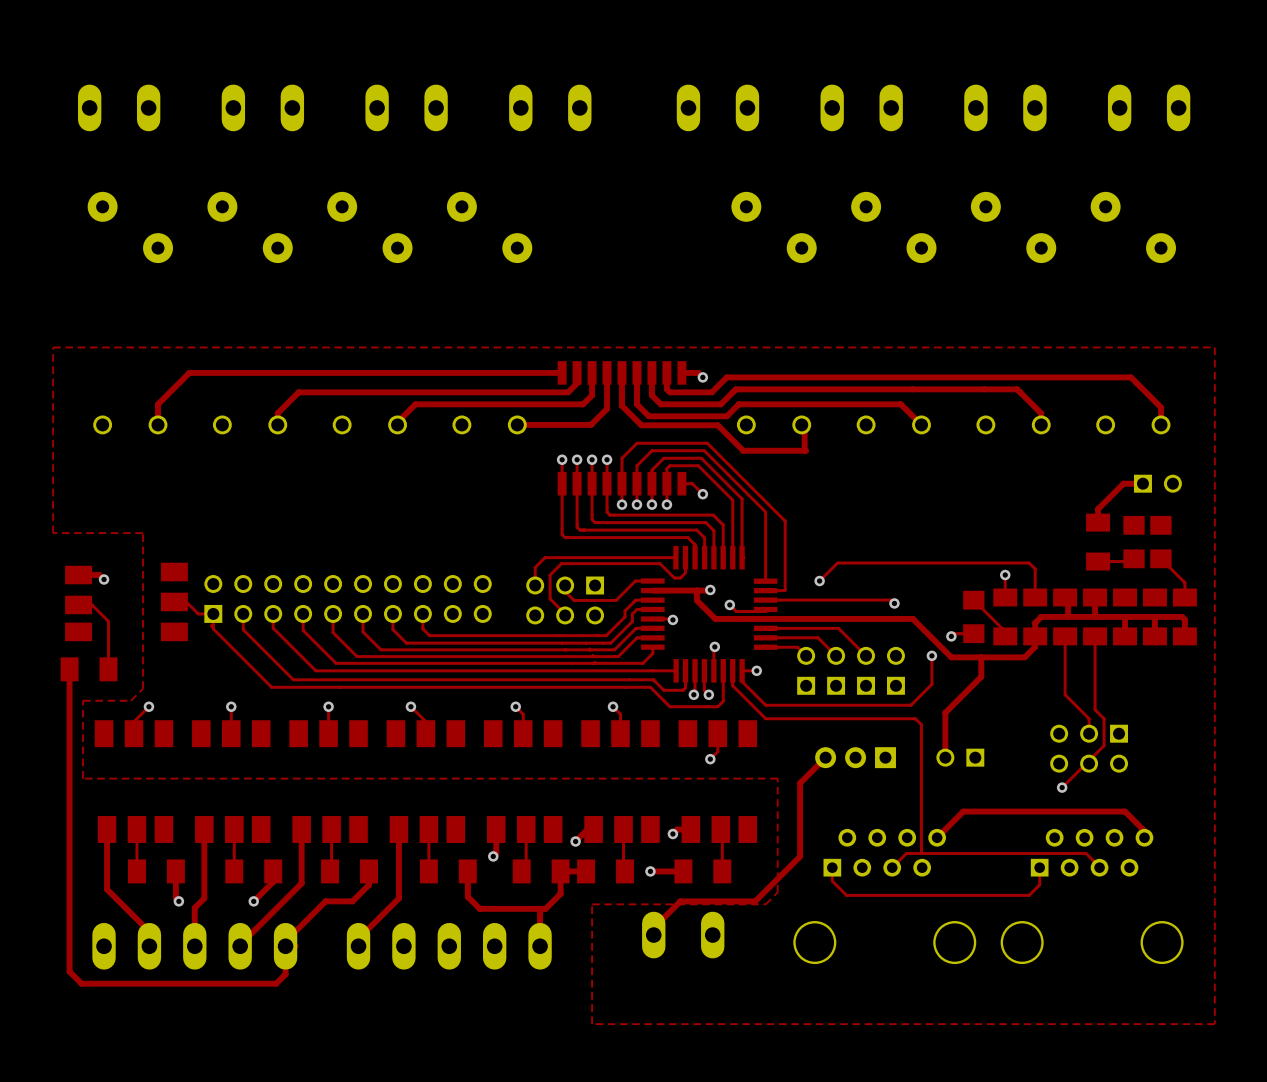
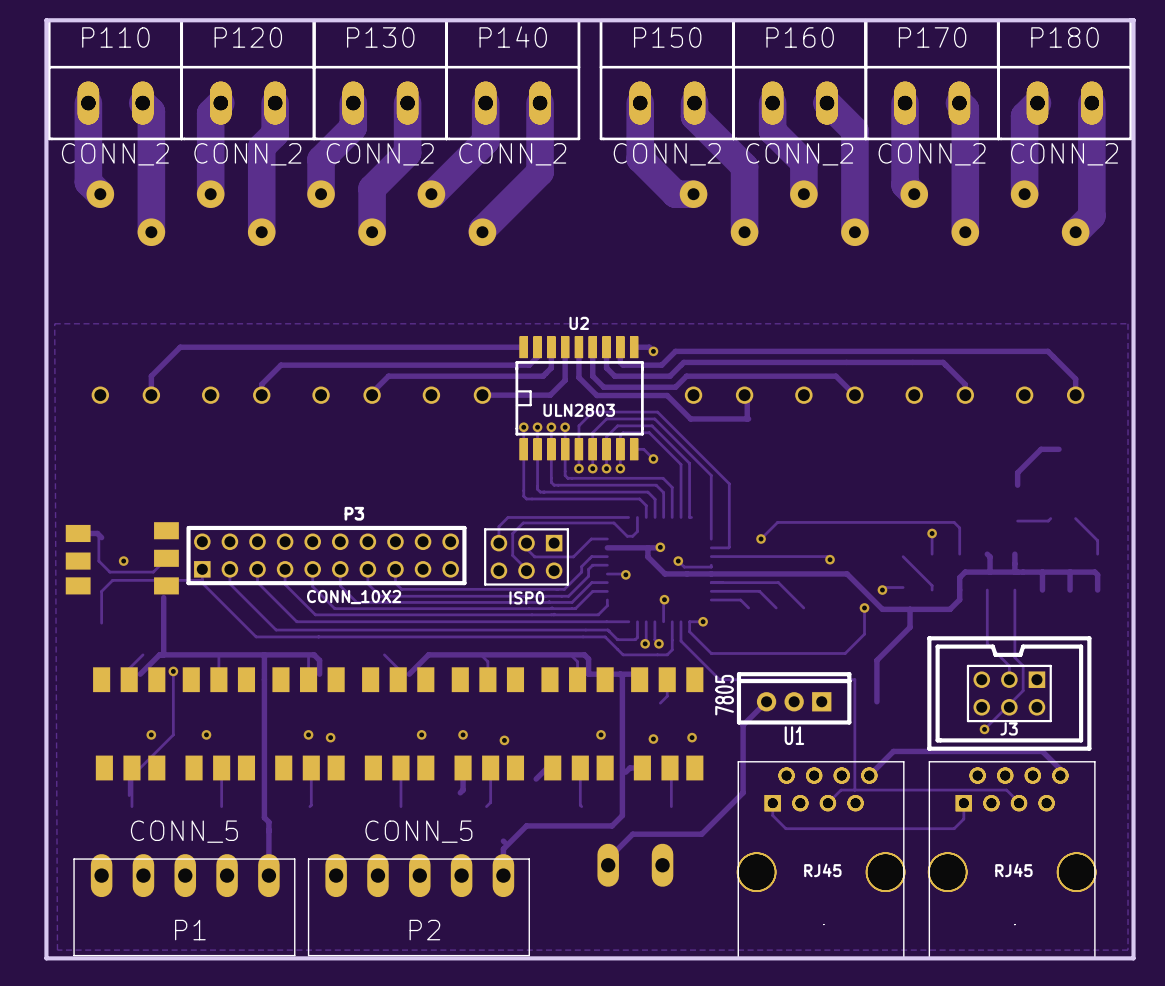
board edge: none -> (46, 20) (1133, 20) (1133, 958) (46, 958) (46, 20)
P110: none -> CONN_2 (115, 79)
P120: none -> CONN_2 (247, 79)
P130: none -> CONN_2 (380, 79)
P140: none -> CONN_2 (512, 79)
P150: none -> CONN_2 (667, 79)
P160: none -> CONN_2 (799, 79)
P170: none -> CONN_2 (932, 79)
P180: none -> CONN_2 (1064, 79)
track: none -> (88, 103) (88, 182) (100, 194)
track: none -> (142, 103) (151, 111) (151, 232)
track: none -> (220, 103) (210, 113) (210, 194)
track: none -> (275, 103) (275, 133) (261, 147) (261, 232)
track: none -> (353, 103) (353, 127) (321, 159) (321, 194)
track: none -> (407, 103) (407, 153) (372, 188) (372, 232)
track: none -> (485, 103) (485, 141) (431, 194)
track: none -> (540, 103) (540, 172) (482, 229) (482, 232)
track: none -> (640, 103) (640, 158) (675, 194) (693, 194)
track: none -> (694, 103) (694, 116) (744, 166) (744, 232)
track: none -> (772, 103) (772, 131) (803, 162) (803, 194)
track: none -> (826, 103) (854, 130) (854, 232)
track: none -> (905, 103) (905, 185) (914, 194)
track: none -> (959, 103) (965, 108) (965, 232)
track: none -> (1037, 103) (1024, 115) (1024, 194)
track: none -> (1091, 103) (1091, 216) (1075, 232)
zone outline: (53, 347) (53, 533) (142, 533) (142, 688) (130, 700) (83, 700) (83, 778) (777, 778) (777, 892) (765, 904) (592, 904) (592, 1024) (1214, 1024) (1214, 347) -> (54, 323) (57, 950) (1128, 950) (1128, 323) (1125, 323)
U2: none -> ULN2803 (579, 398)
part: (1157, 483) -> none
part: (1098, 542) -> none
part: (1134, 542) -> none
part: (1160, 542) -> none
track: none -> (98, 534) (98, 561) (109, 572) (153, 572) (163, 561)
via position: (104, 579) -> (123, 561)
part: (348, 598) -> none
P3: none -> CONN_10X2 (326, 555)
ISP0: none -> (526, 556)
track: (174, 601) (186, 601) (198, 613) (213, 613) -> none
track: (78, 604) (92, 604) (108, 621) (108, 669) -> none
part: (709, 614) -> none
part: (973, 616) -> none
part: (1005, 616) -> none
part: (1035, 616) -> none
part: (1065, 616) -> none
part: (1095, 616) -> none
part: (1125, 616) -> none
part: (1154, 616) -> none
part: (1184, 616) -> none
track: none -> (200, 580) (112, 580) (101, 591) (101, 623)
track: none -> (163, 597) (163, 654)
track: (69, 669) (69, 971) (81, 983) (276, 983) (285, 974) (285, 946) (295, 946) -> none
part: (89, 669) -> none
part: (806, 670) -> none
part: (836, 670) -> none
part: (866, 670) -> none
part: (895, 670) -> none
track: (732, 685) (765, 718) (915, 718) (921, 724) (921, 733) -> (680, 635) (680, 641) (719, 679) (854, 679)
via: (148, 706) -> none
via: (231, 706) -> none
via: (328, 706) -> none
via: (410, 706) -> none
via: (515, 706) -> none
via: (613, 706) -> none
track: none -> (173, 671) (173, 734) (129, 779) (129, 795)
via: none -> (173, 671)
track: none -> (140, 674) (159, 654) (314, 654) (319, 660) (319, 674)
track: none -> (409, 674) (428, 654) (584, 654) (588, 659) (588, 674) (643, 674)
J3: none -> (1009, 693)
U1: none -> 7805 (794, 698)
part: (960, 757) -> none
via: (710, 759) -> none
via: none -> (151, 734)
via: none -> (206, 734)
via: none -> (308, 734)
via: none -> (421, 734)
via: none -> (463, 734)
via: none -> (601, 734)
via: none -> (330, 737)
via: none -> (692, 737)
via: none -> (653, 739)
via: none -> (504, 740)
track: (107, 829) (107, 889) (149, 931) (149, 946) -> none
track: (204, 829) (204, 898) (194, 907) (194, 946) -> none
track: (301, 829) (301, 883) (240, 946) -> none
track: (398, 829) (398, 898) (358, 938) (358, 946) -> none
via: (672, 834) -> none
via: (575, 841) -> none
via: (493, 856) -> none
part: (156, 871) -> none
track: (175, 871) (175, 898) (178, 901) -> none
part: (253, 871) -> none
track: (273, 871) (273, 881) (253, 901) -> none
part: (349, 871) -> none
track: (369, 871) (369, 884) (352, 901) (325, 901) (285, 941) -> (264, 654) (264, 817) (268, 822) (268, 871)
part: (448, 871) -> none
track: (467, 871) (467, 896) (479, 908) (540, 908) (540, 917) -> (620, 674) (622, 676) (622, 815) (612, 825) (526, 825) (503, 849)
part: (541, 871) -> none
track: (586, 871) (560, 871) (560, 893) (545, 908) (541, 910) -> none
part: (605, 871) -> none
track: (650, 871) (683, 871) -> none
via: (650, 871) -> none
part: (702, 871) -> none
via: (178, 901) -> none
via: (253, 901) -> none
part: none -> RJ45 (821, 859)
part: none -> RJ45 (1012, 859)
part: (194, 946) -> none
part: (449, 946) -> none
P1: none -> CONN_5 (184, 905)
P2: none -> CONN_5 (418, 905)

